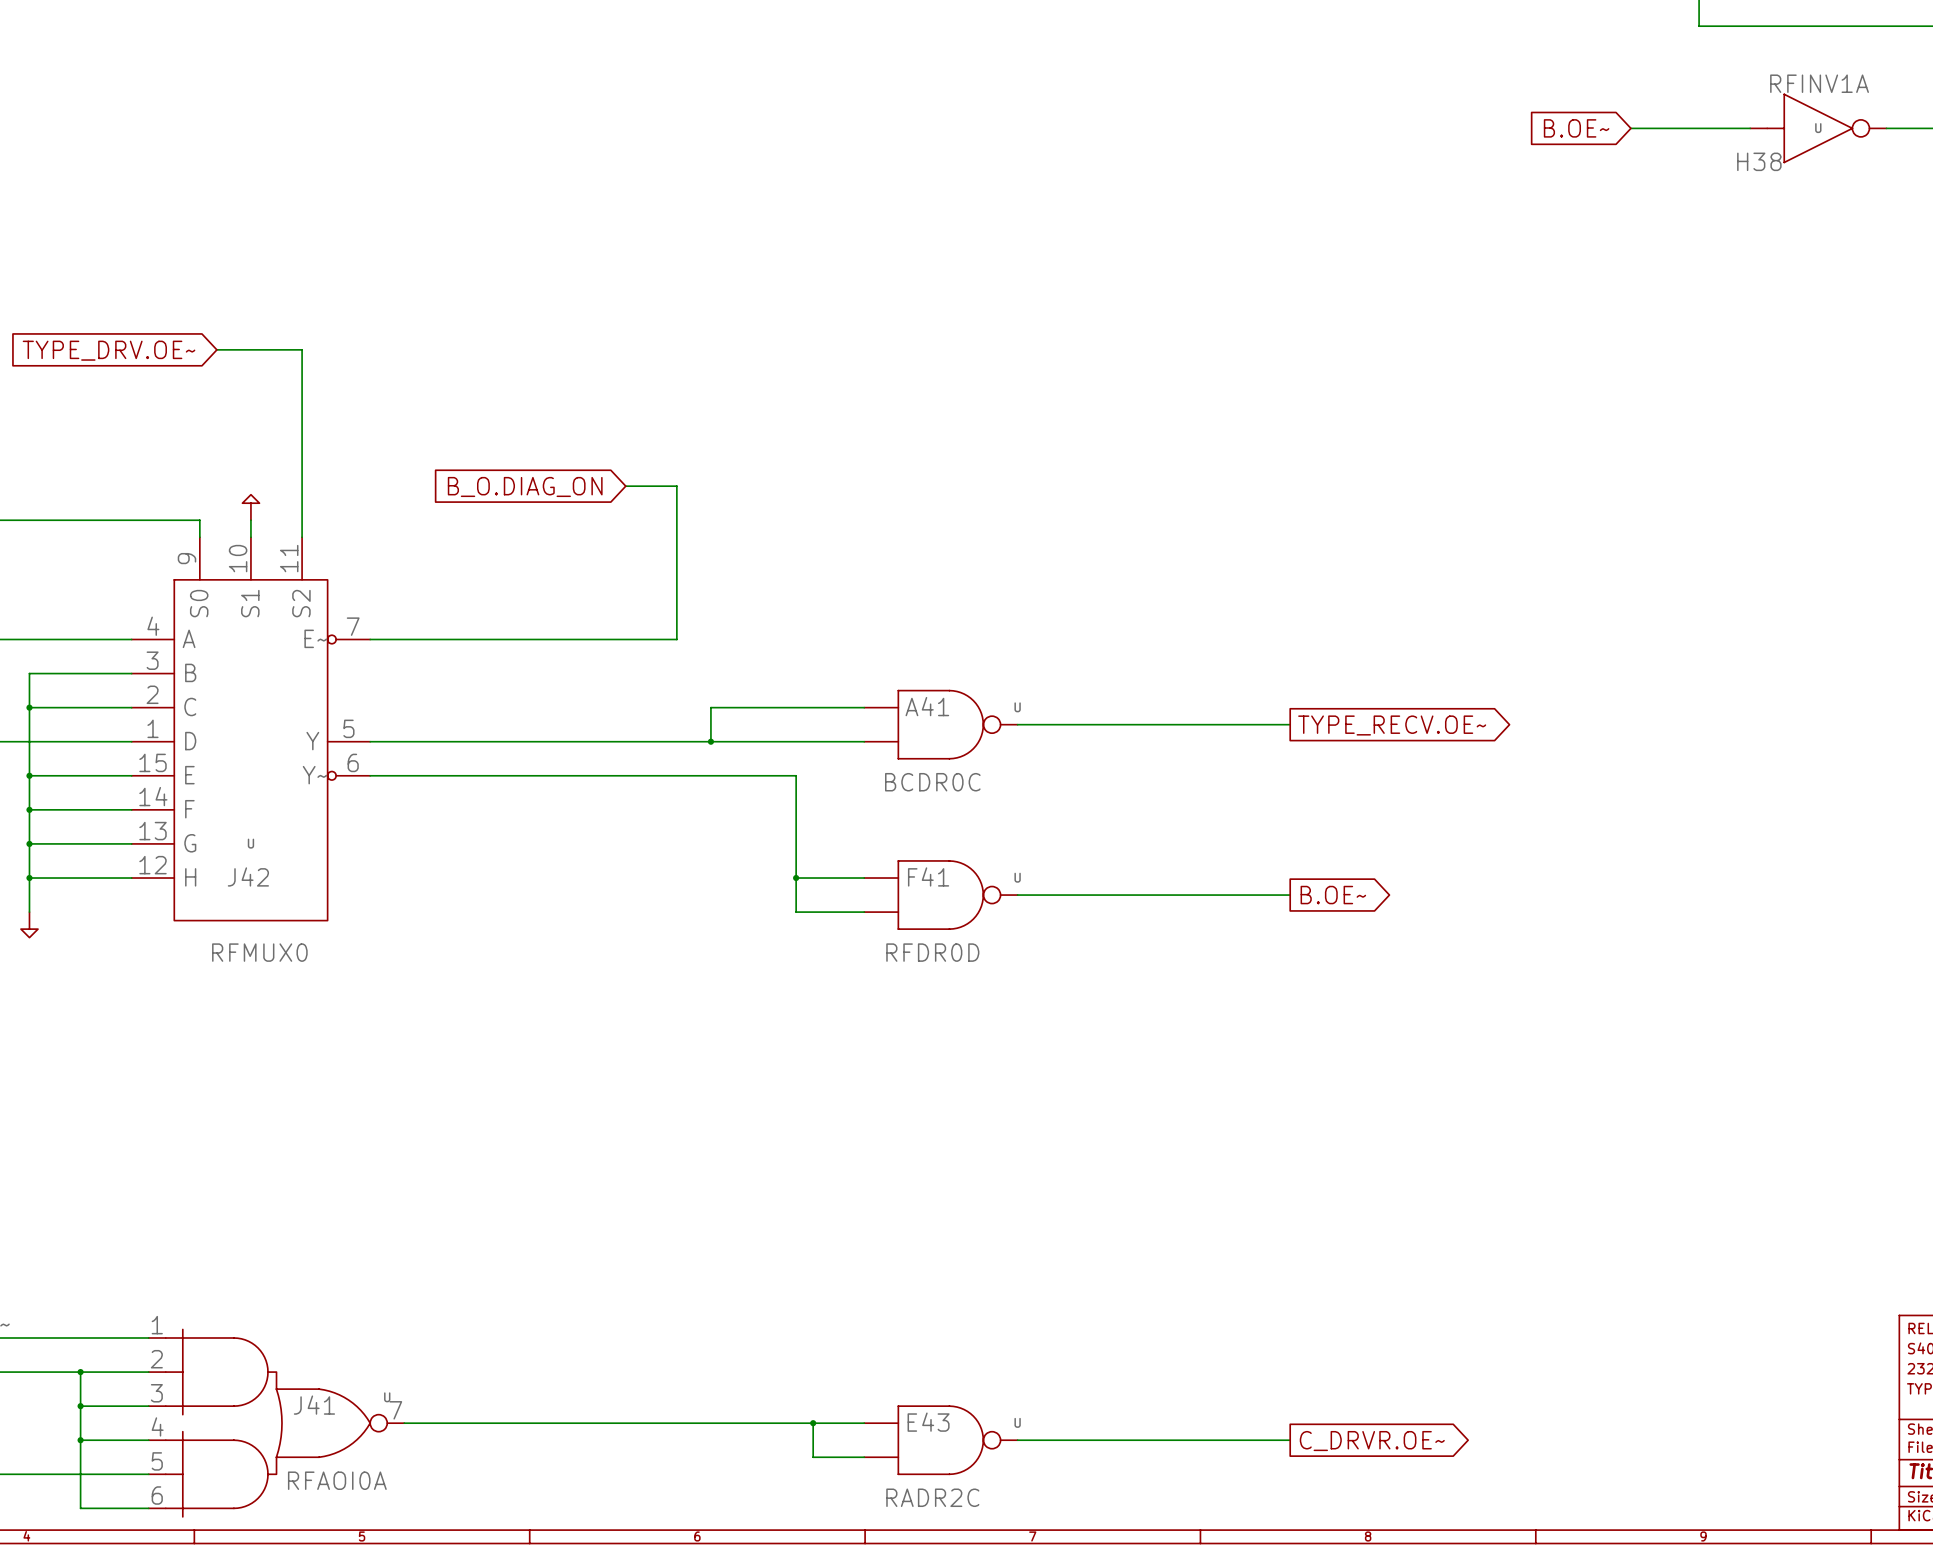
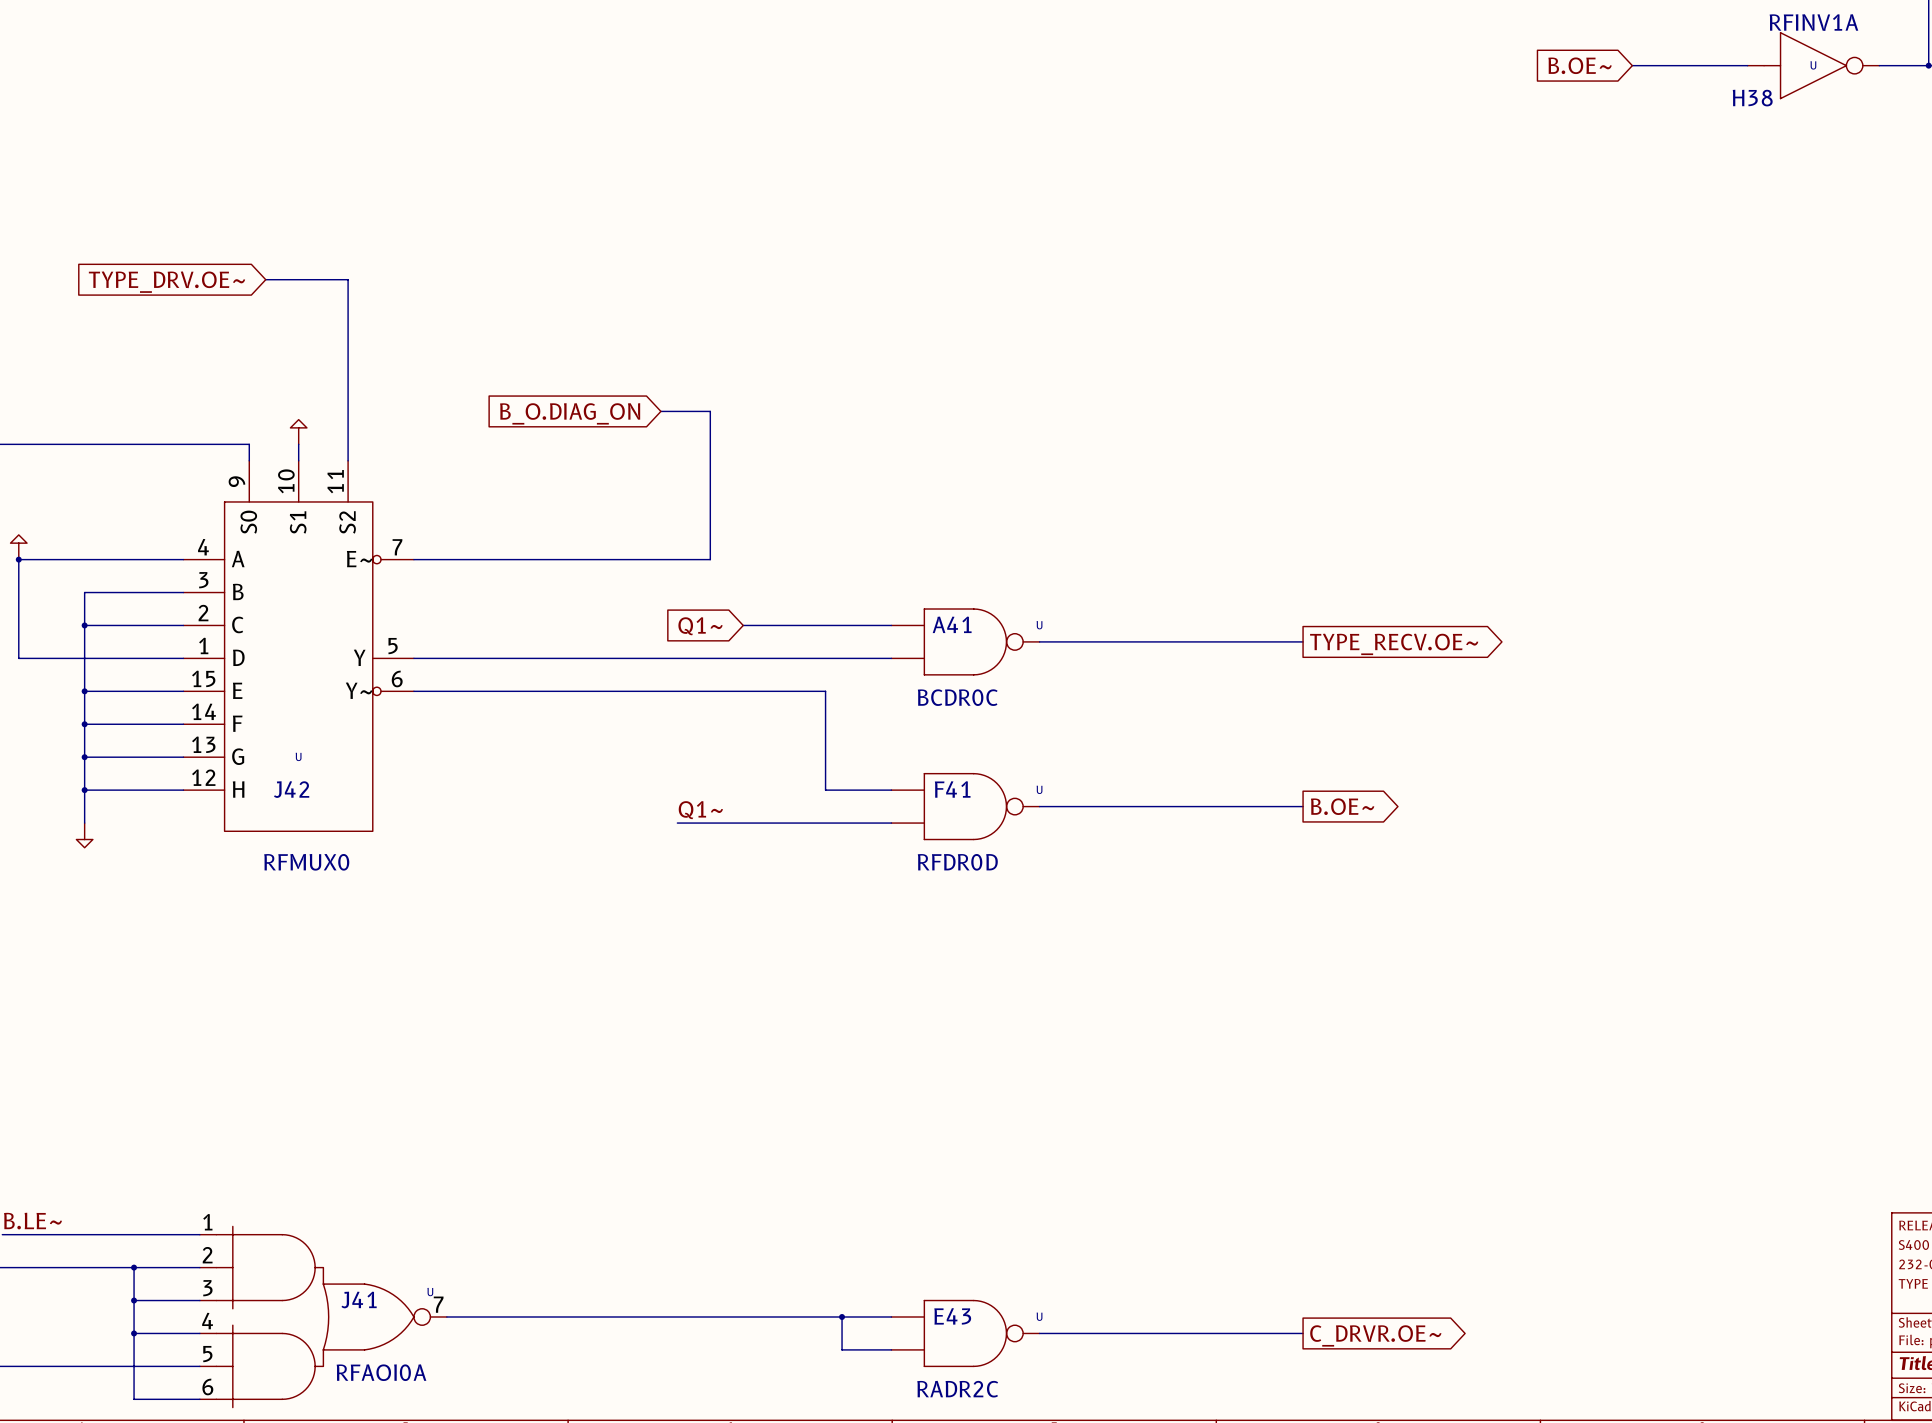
wire: (710, 707) (710, 741) -> none
global label: none -> Q1~ (700, 626)
junction: (710, 741) -> none
wire: (796, 878) (796, 912) -> (677, 823) (825, 823)
junction: (796, 878) -> none
label: none -> Q1~ (700, 810)

